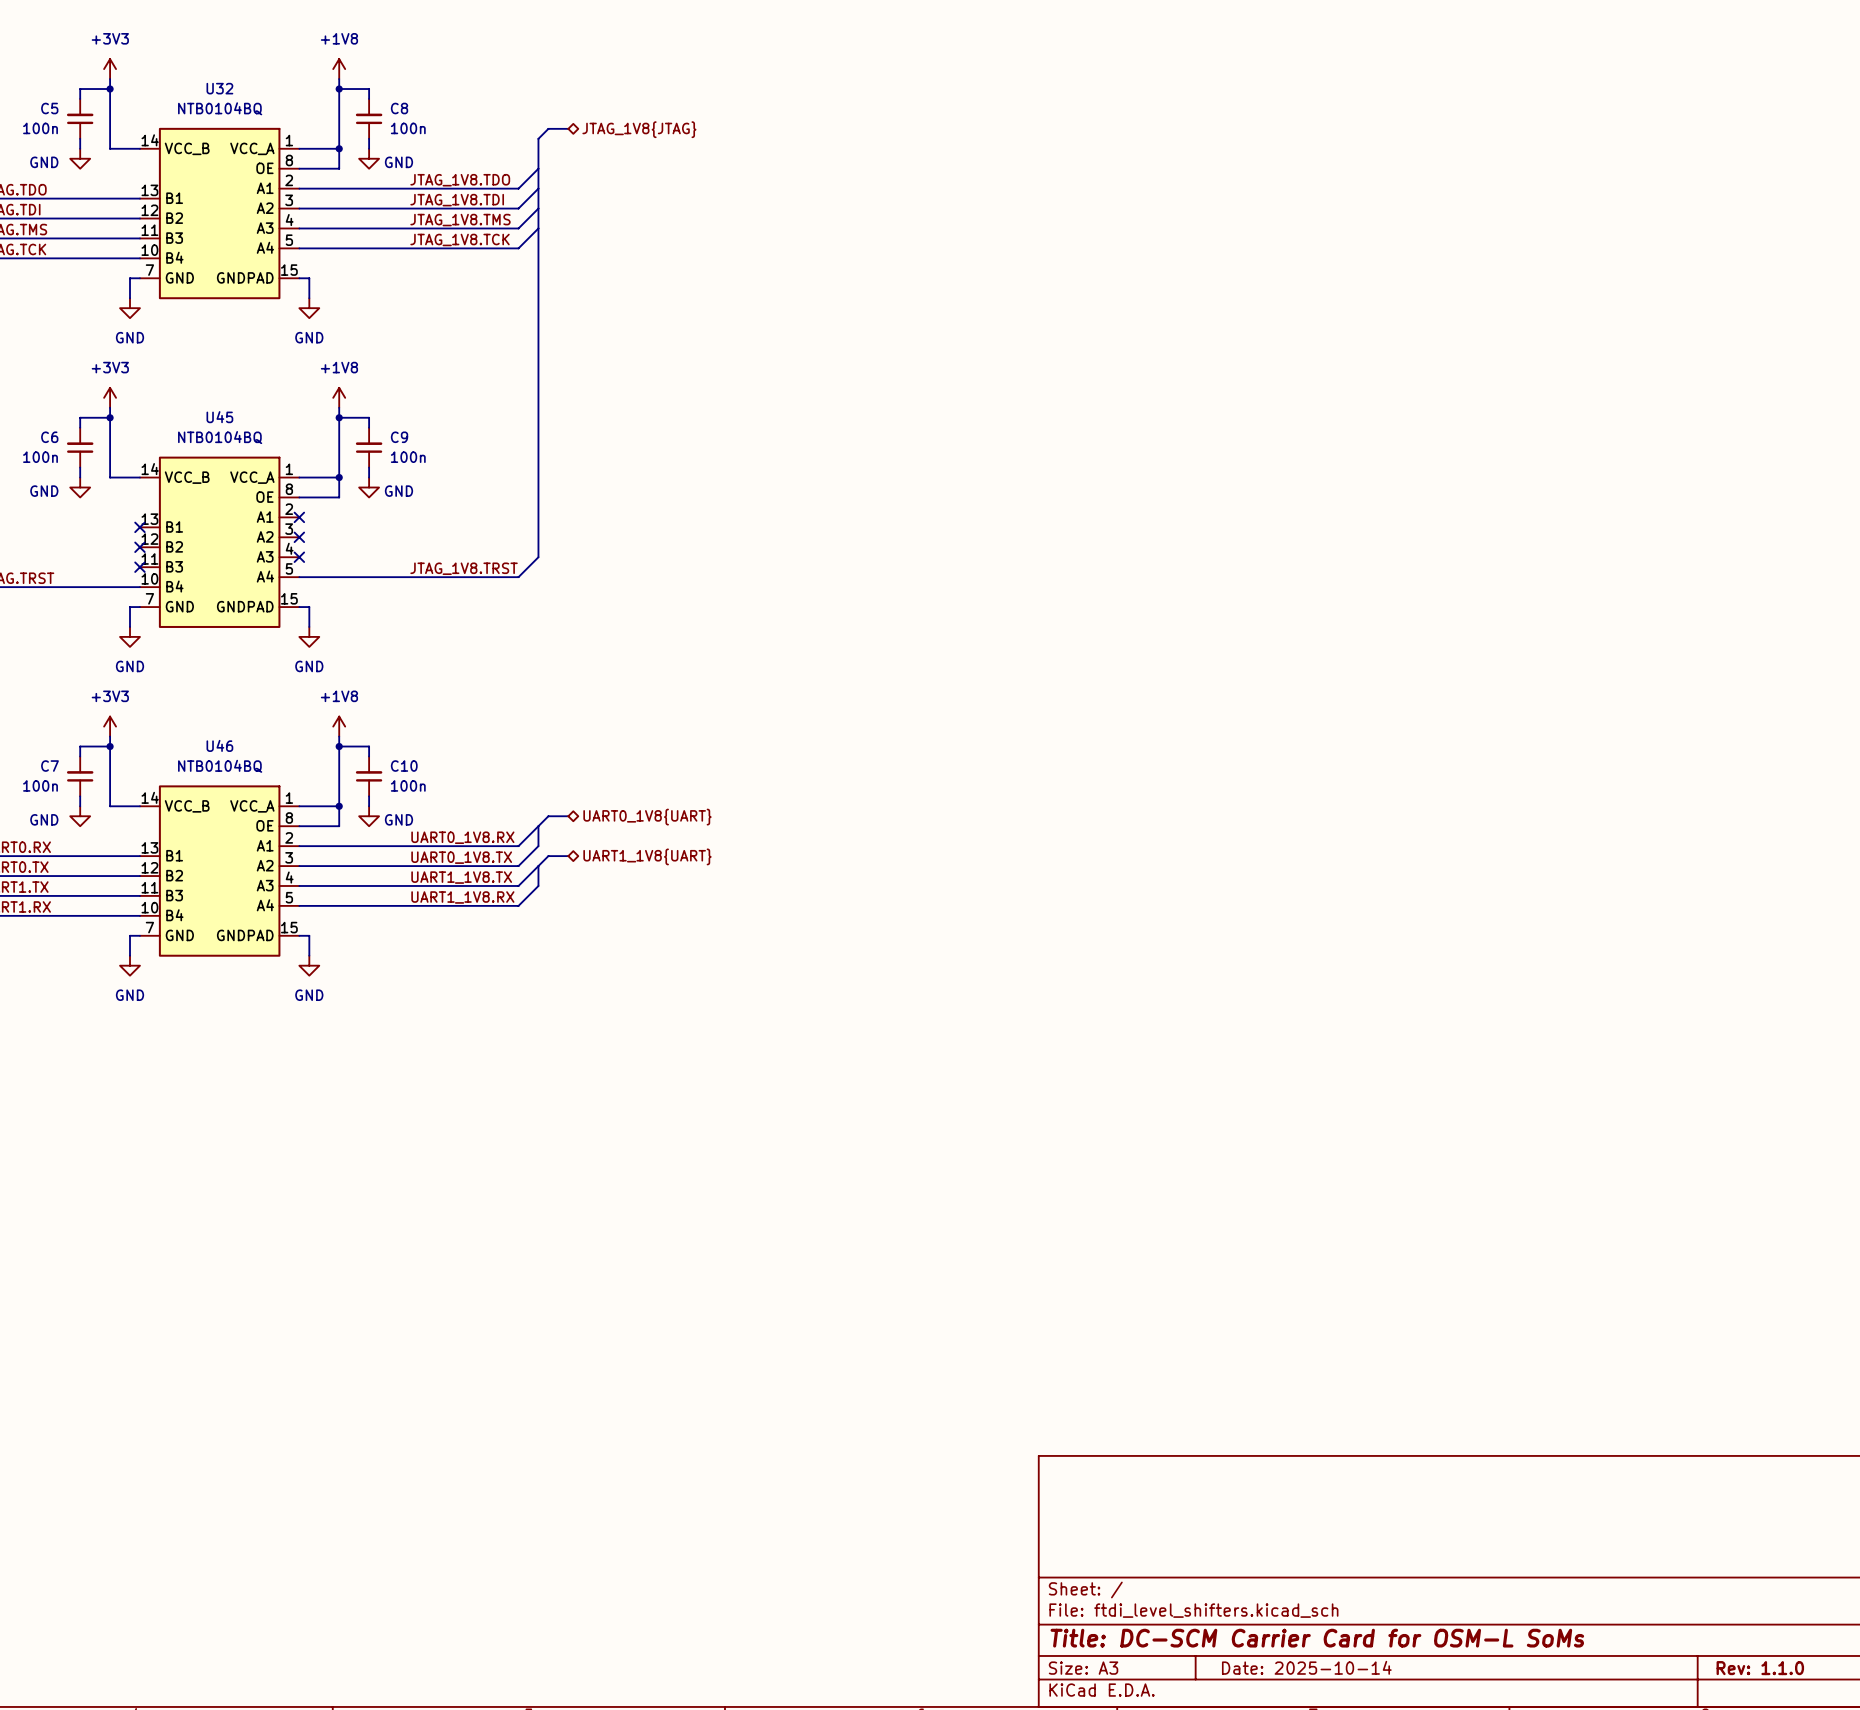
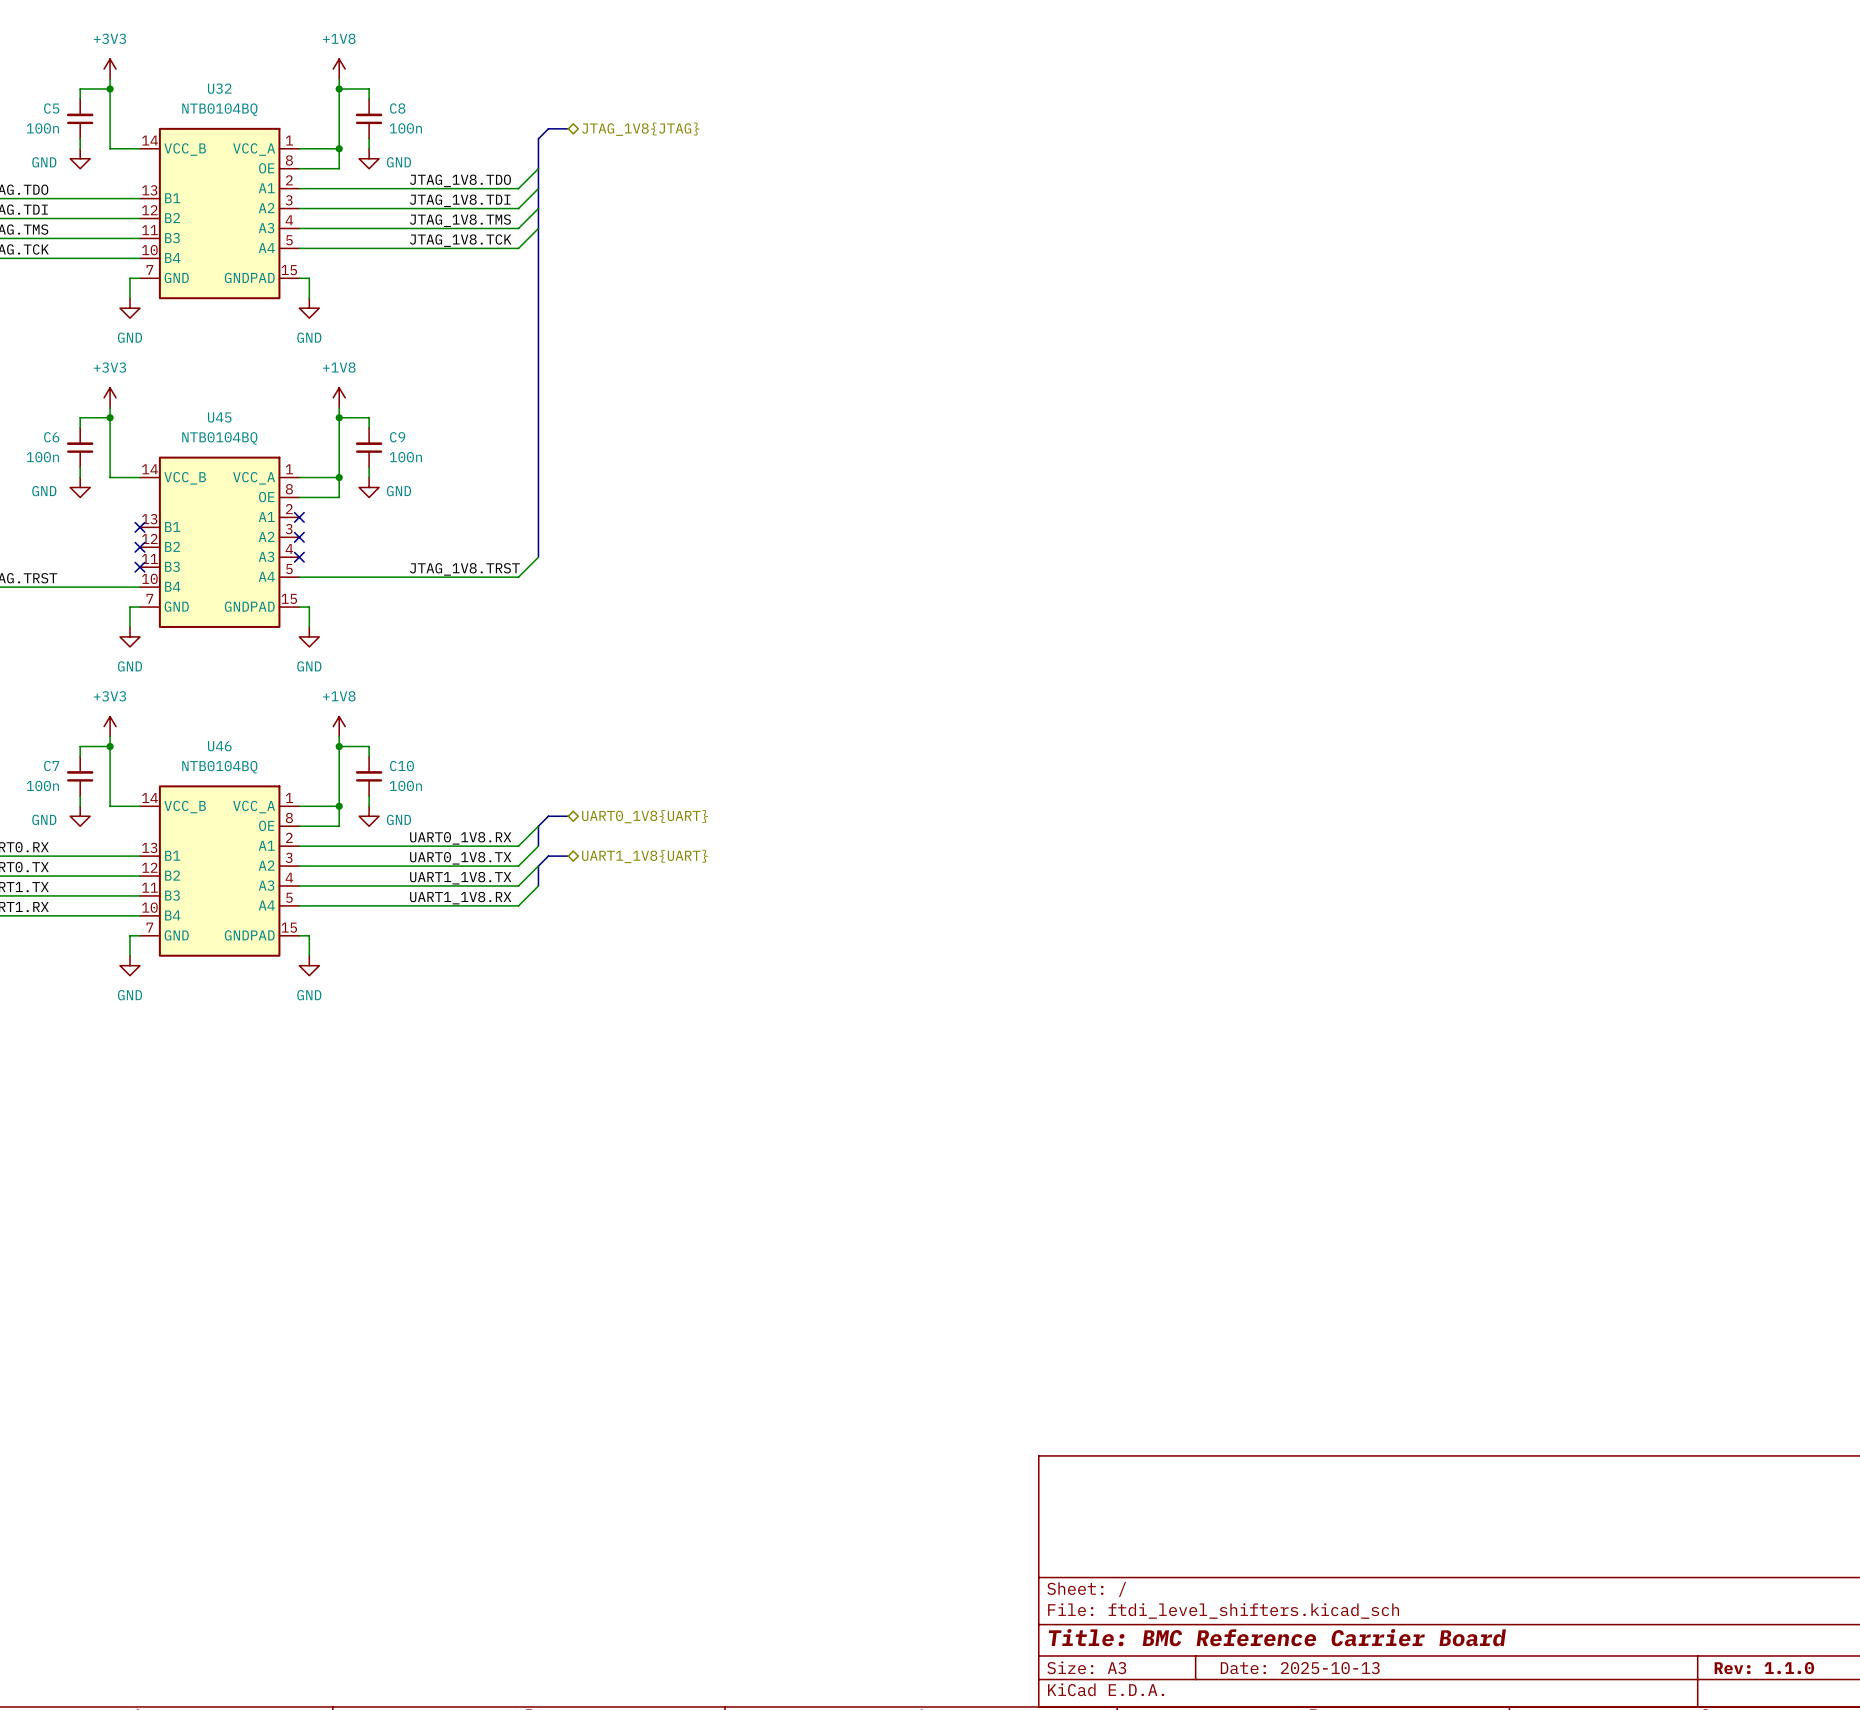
title block: Title: DC-SCM Carrier Card for OSM-L SoMs (1317, 1638) -> Title: BMC Reference Carrier Board (1277, 1637)
title block: Date: 2025-10-14 (1306, 1667) -> Date: 2025-10-13 (1300, 1668)

